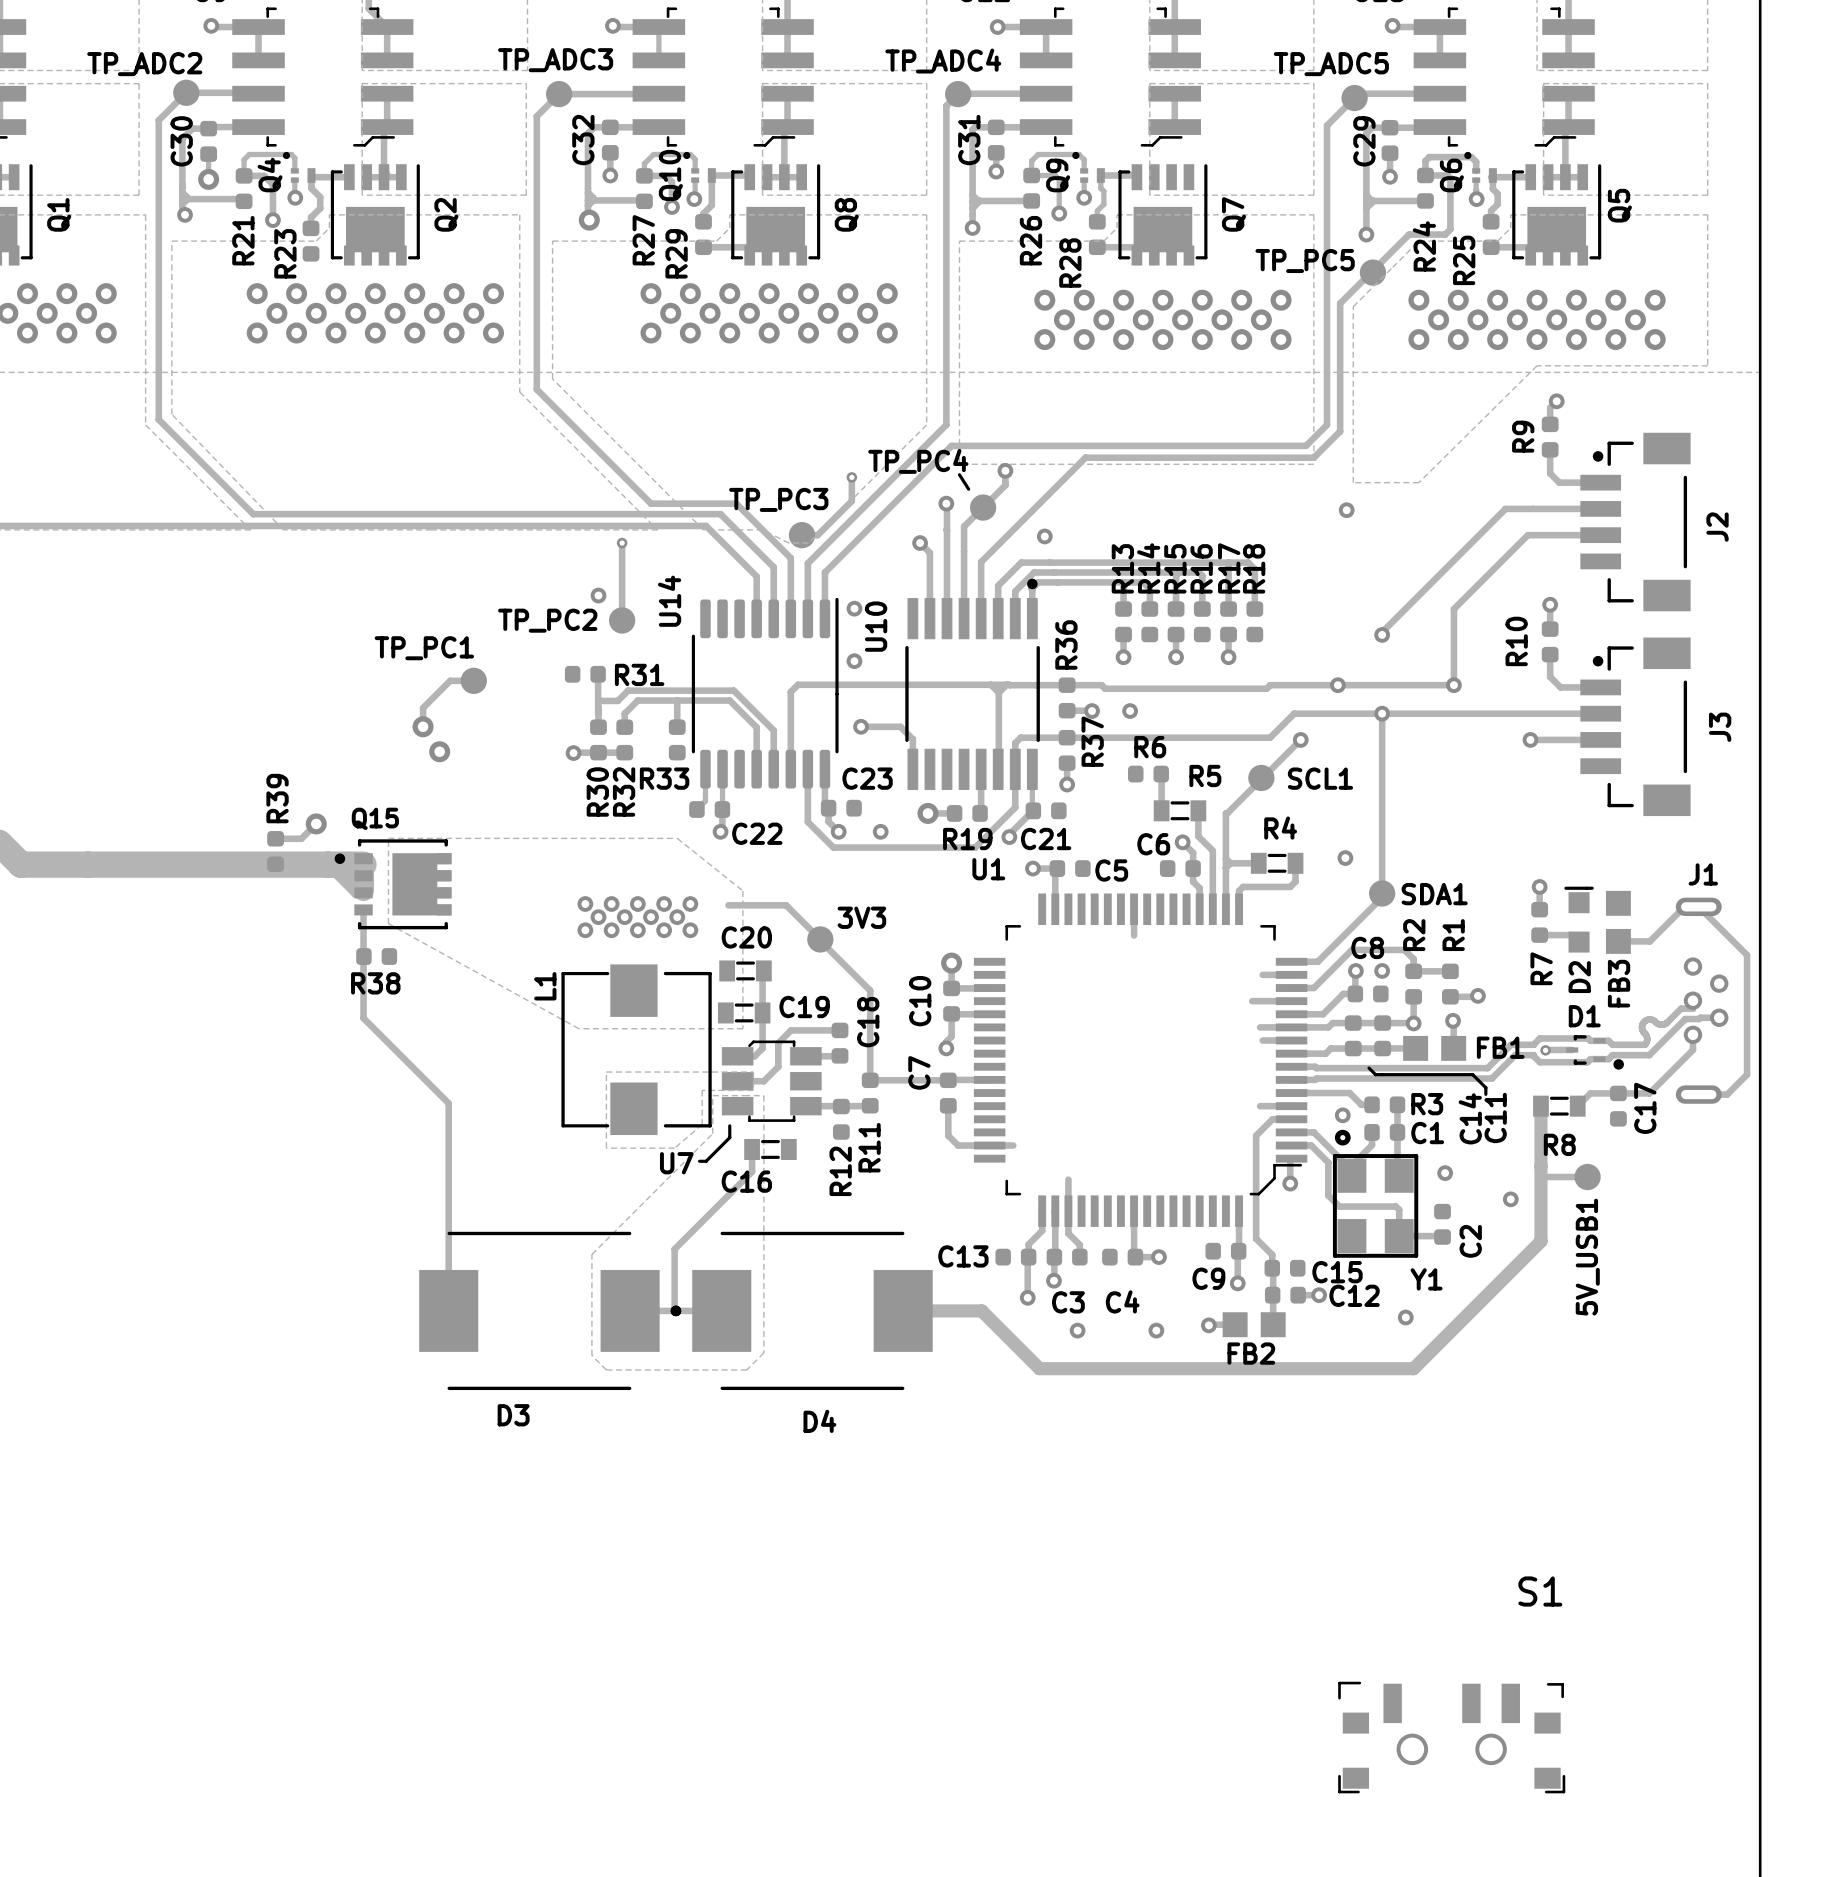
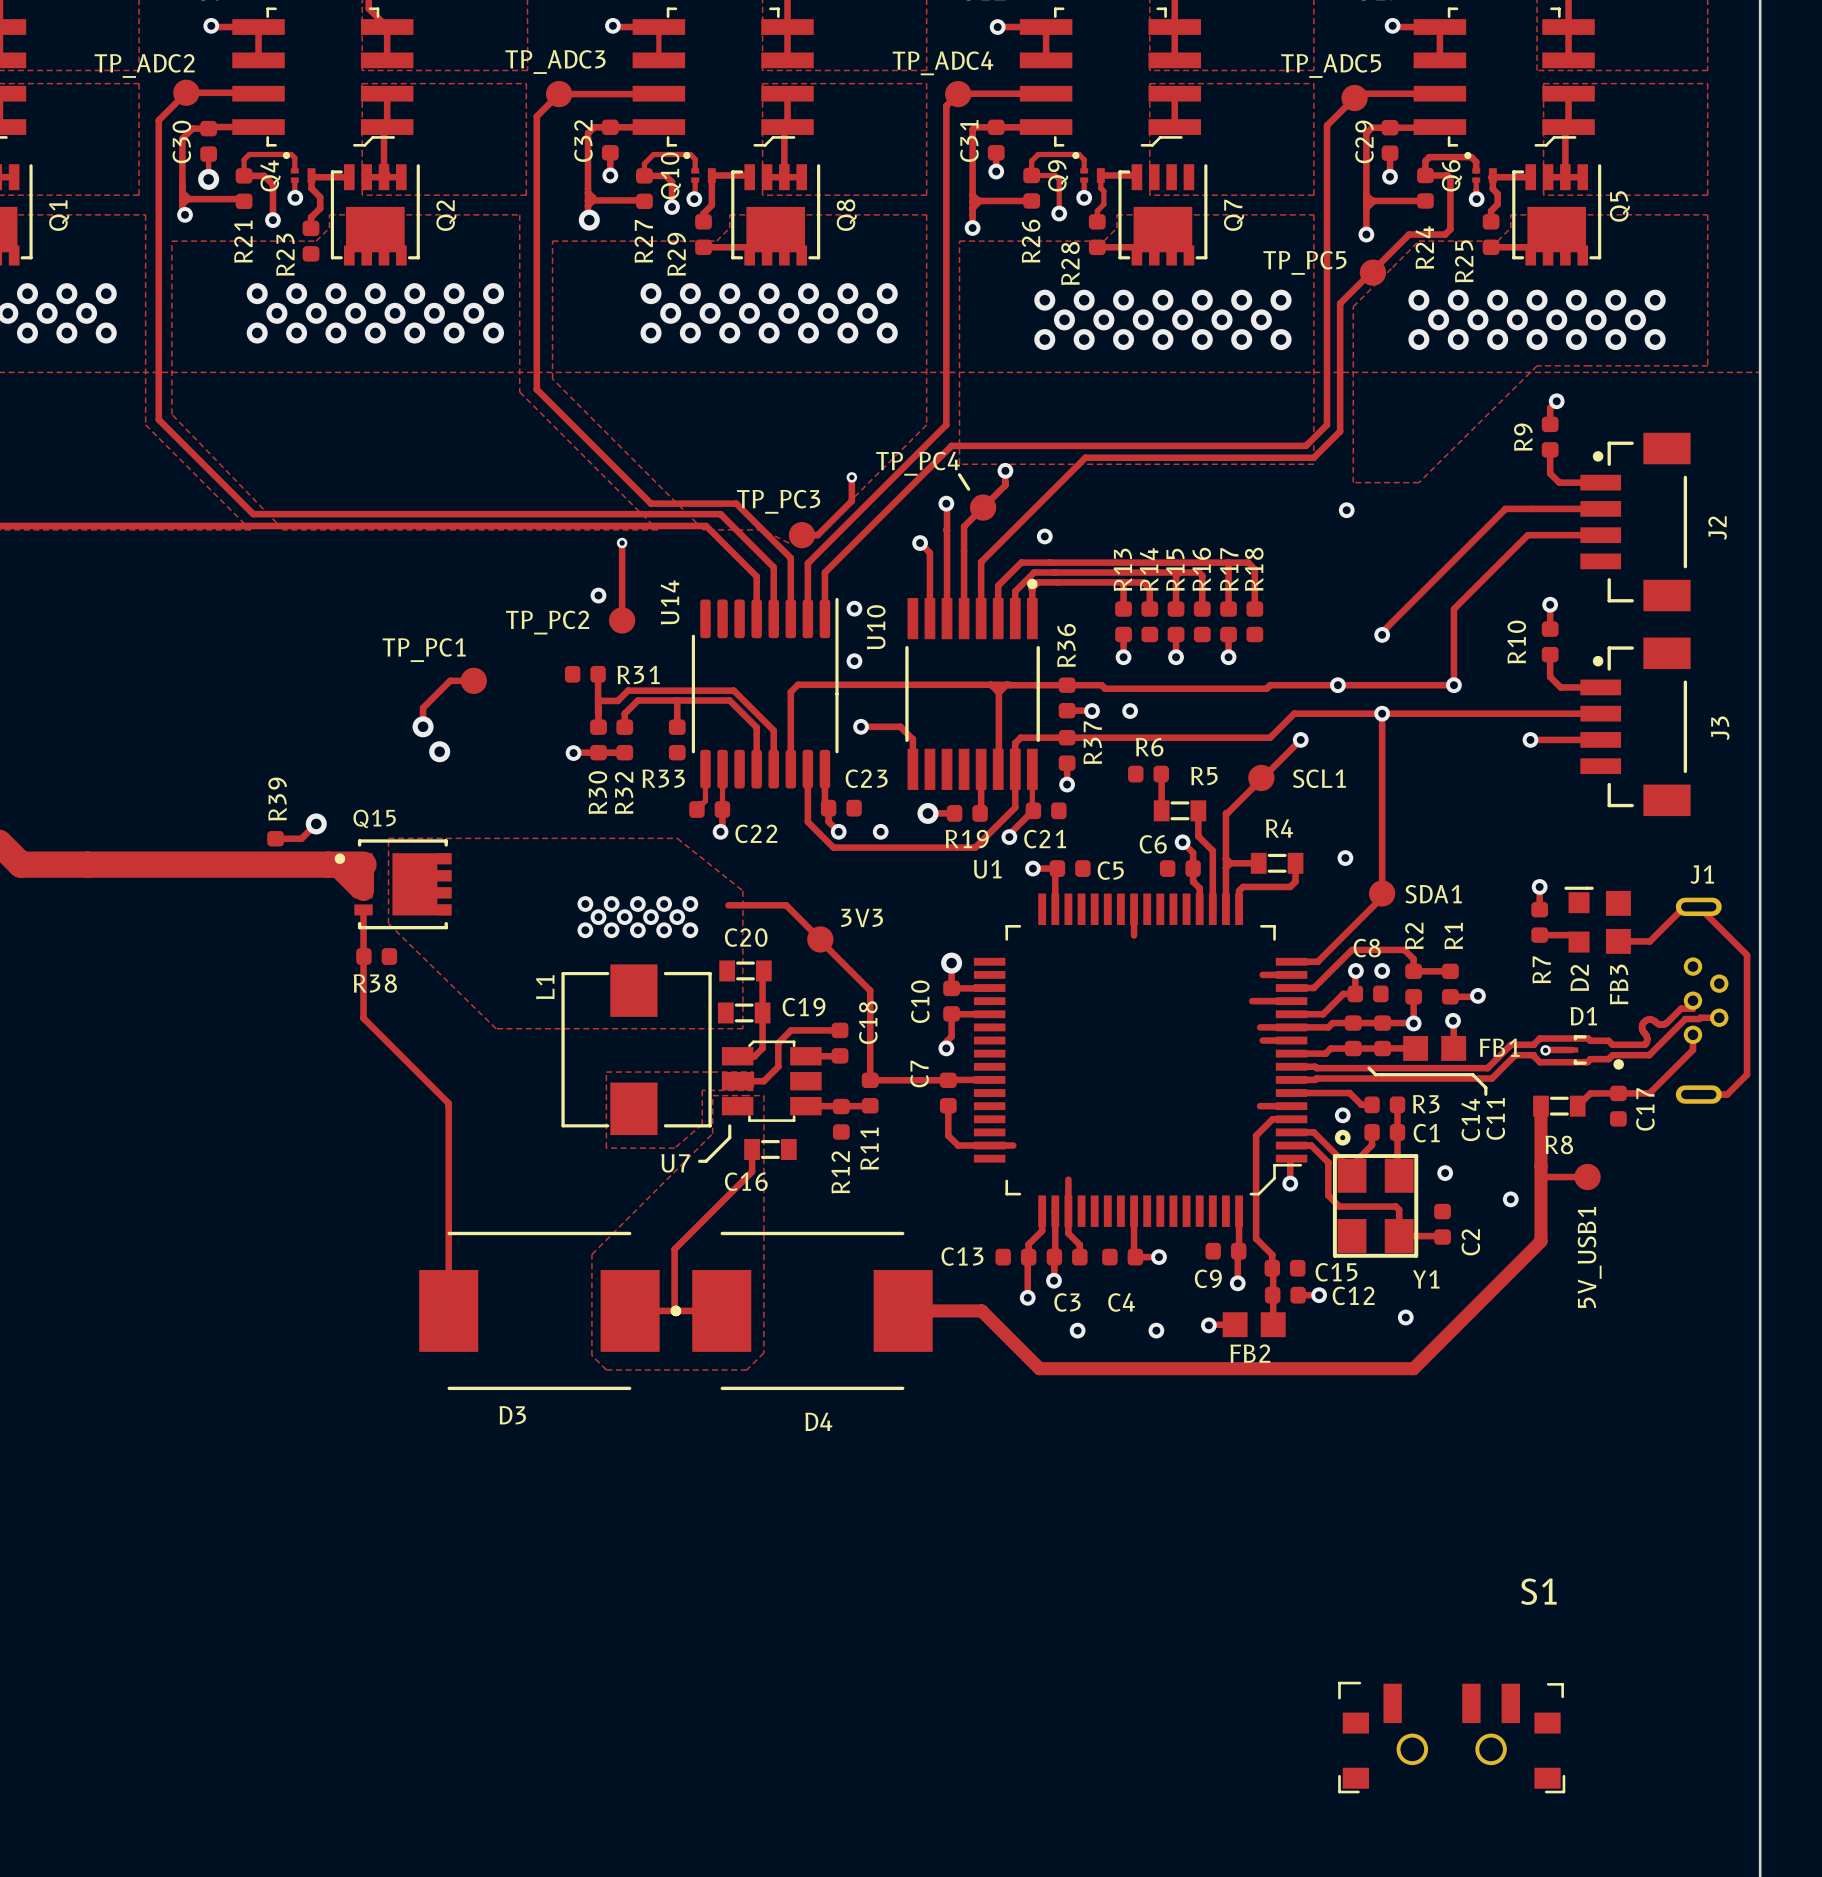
zone outline: (388, 923) (578, 1028) -> (388, 923) (496, 1028) (578, 1028)

